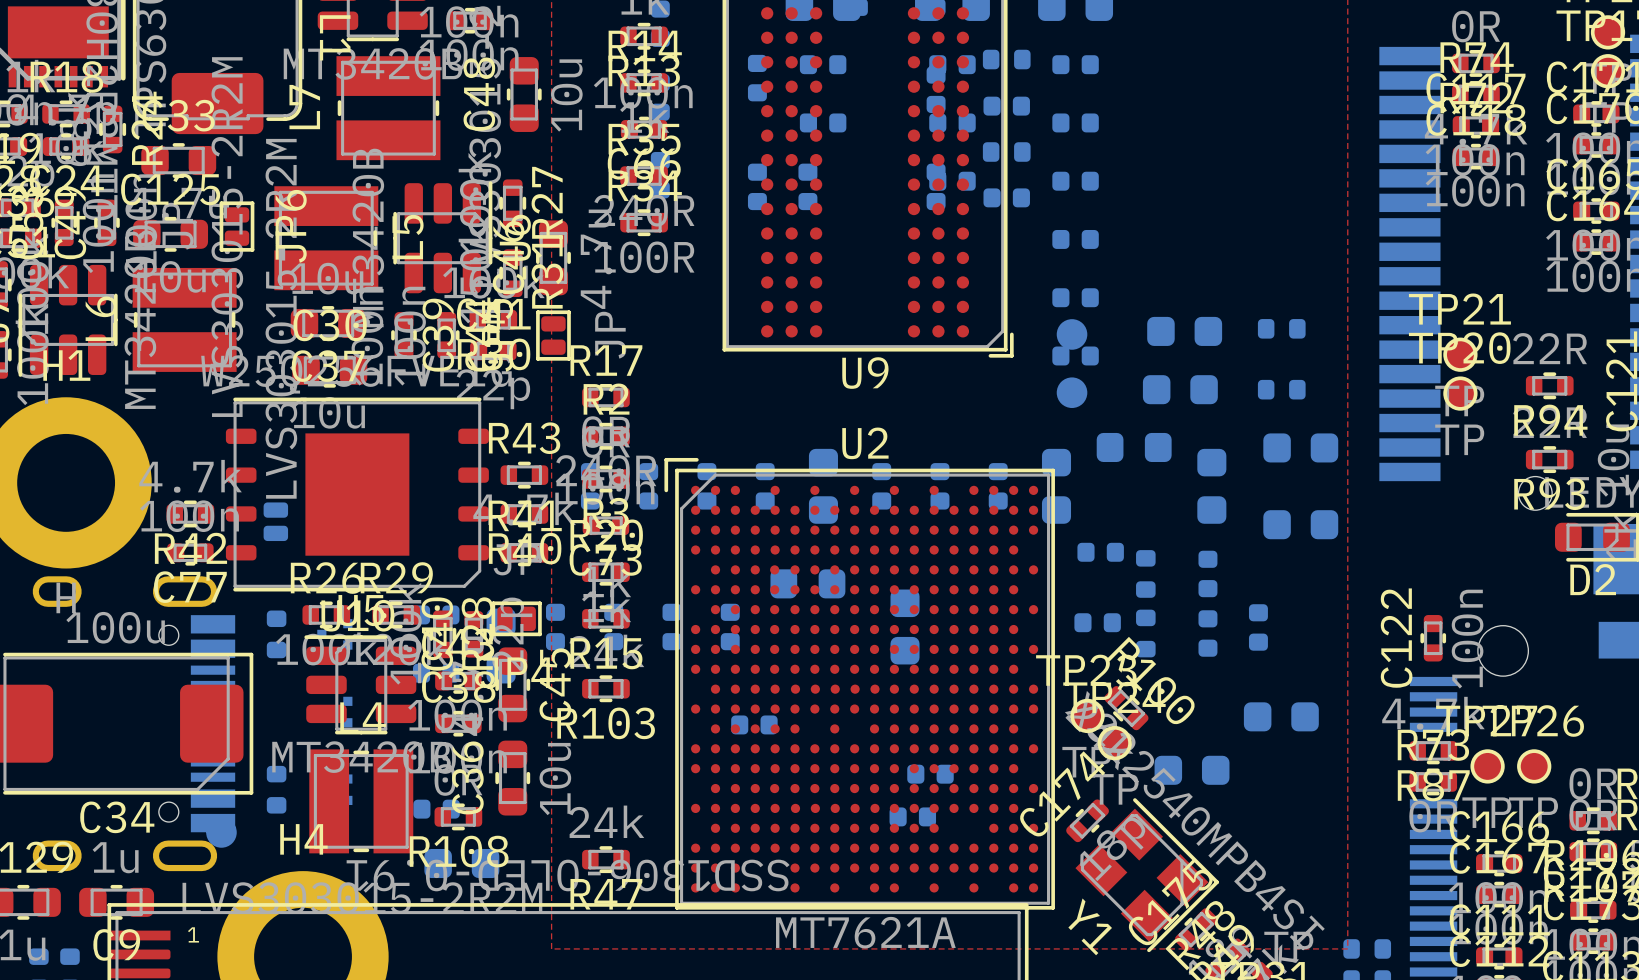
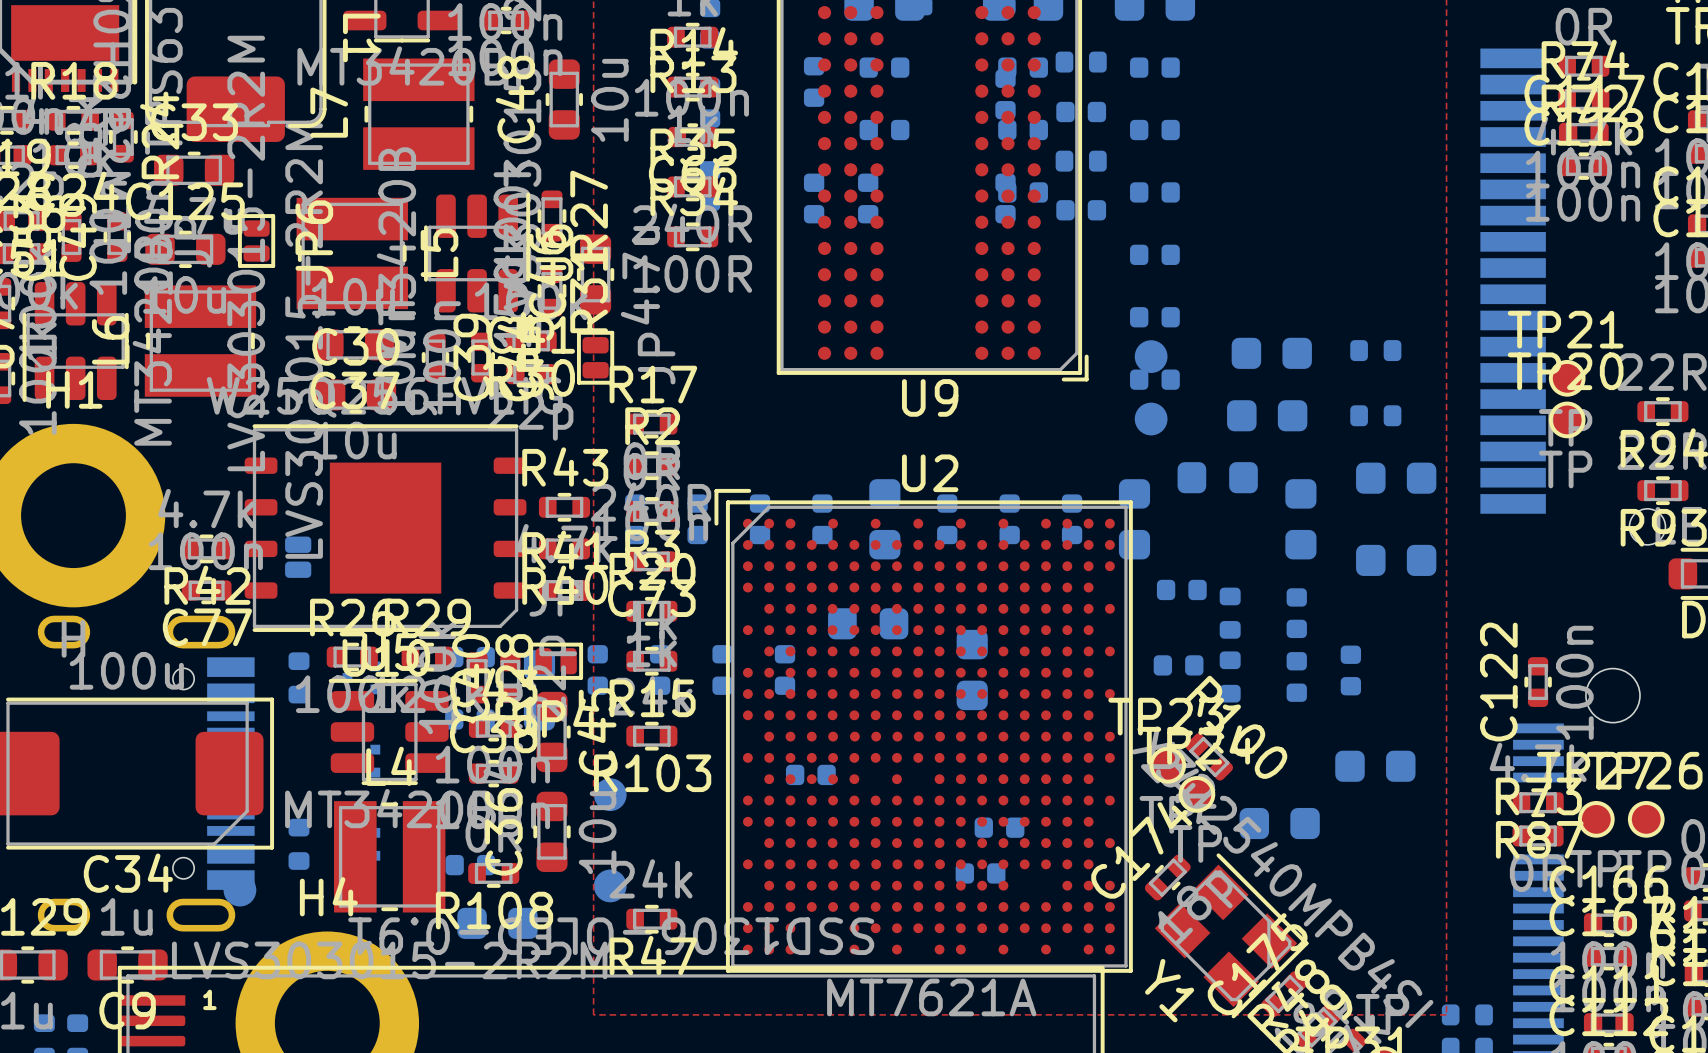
part: none -> (610, 794)
part: none -> (610, 885)

